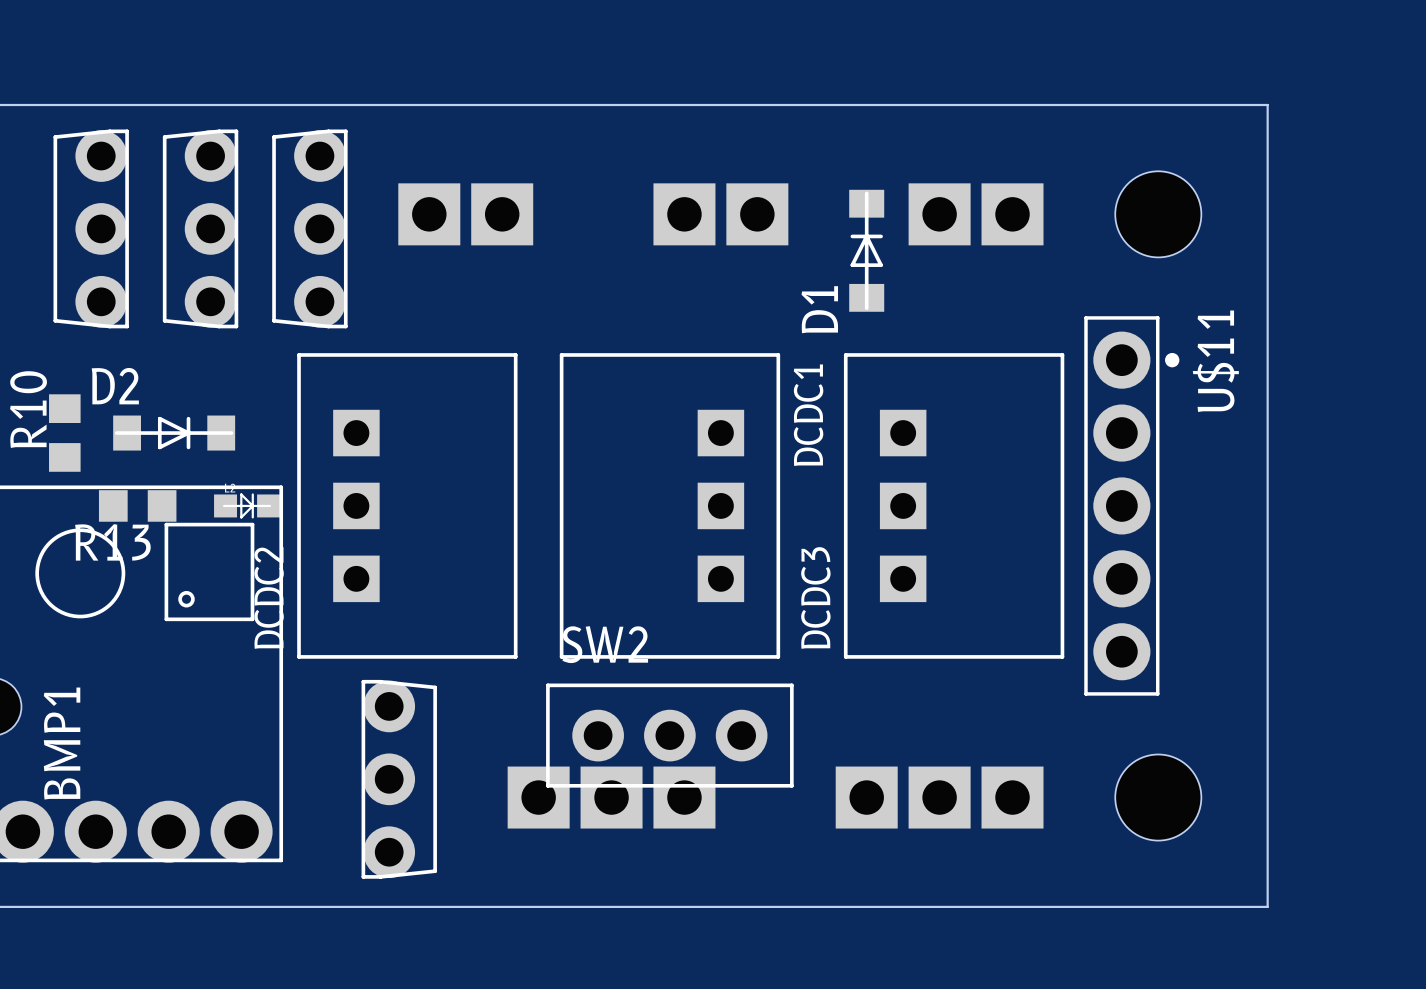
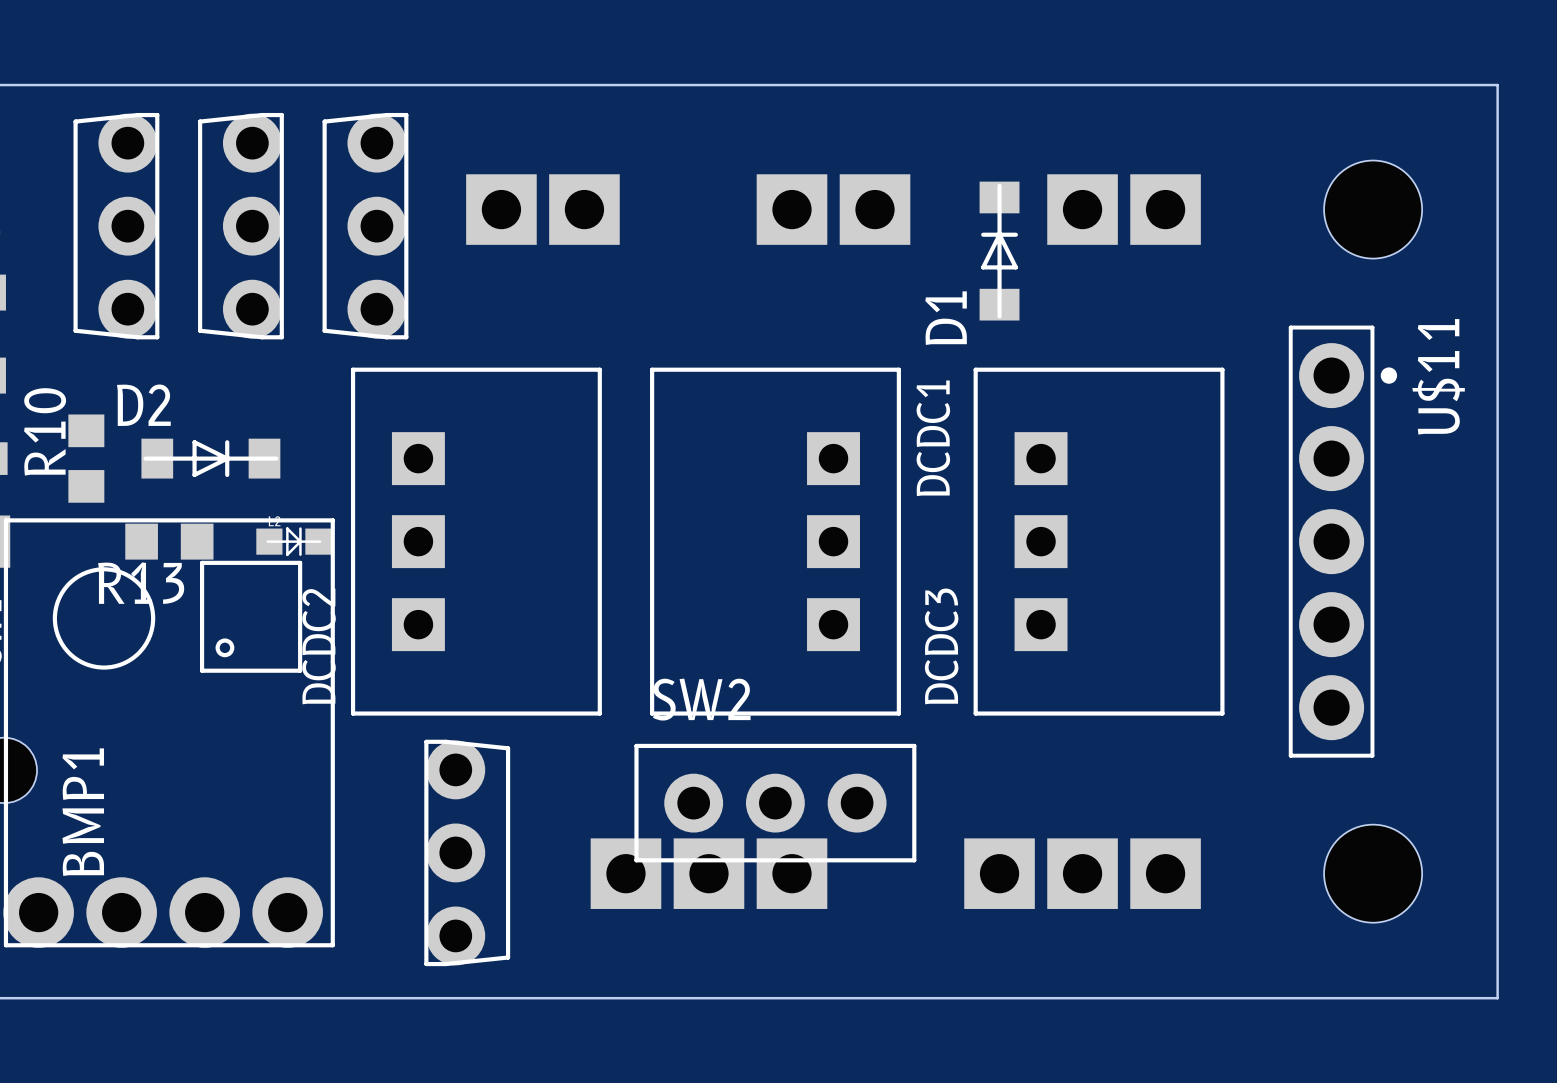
board edge: (1267, 104) (1267, 906) -> (1456, 85) (1497, 85) (1497, 998) (1456, 998)
hole position: (1158, 214) -> (1373, 209)
U$11 position: (1131, 505) -> (1342, 541)
hole position: (1158, 797) -> (1373, 873)

